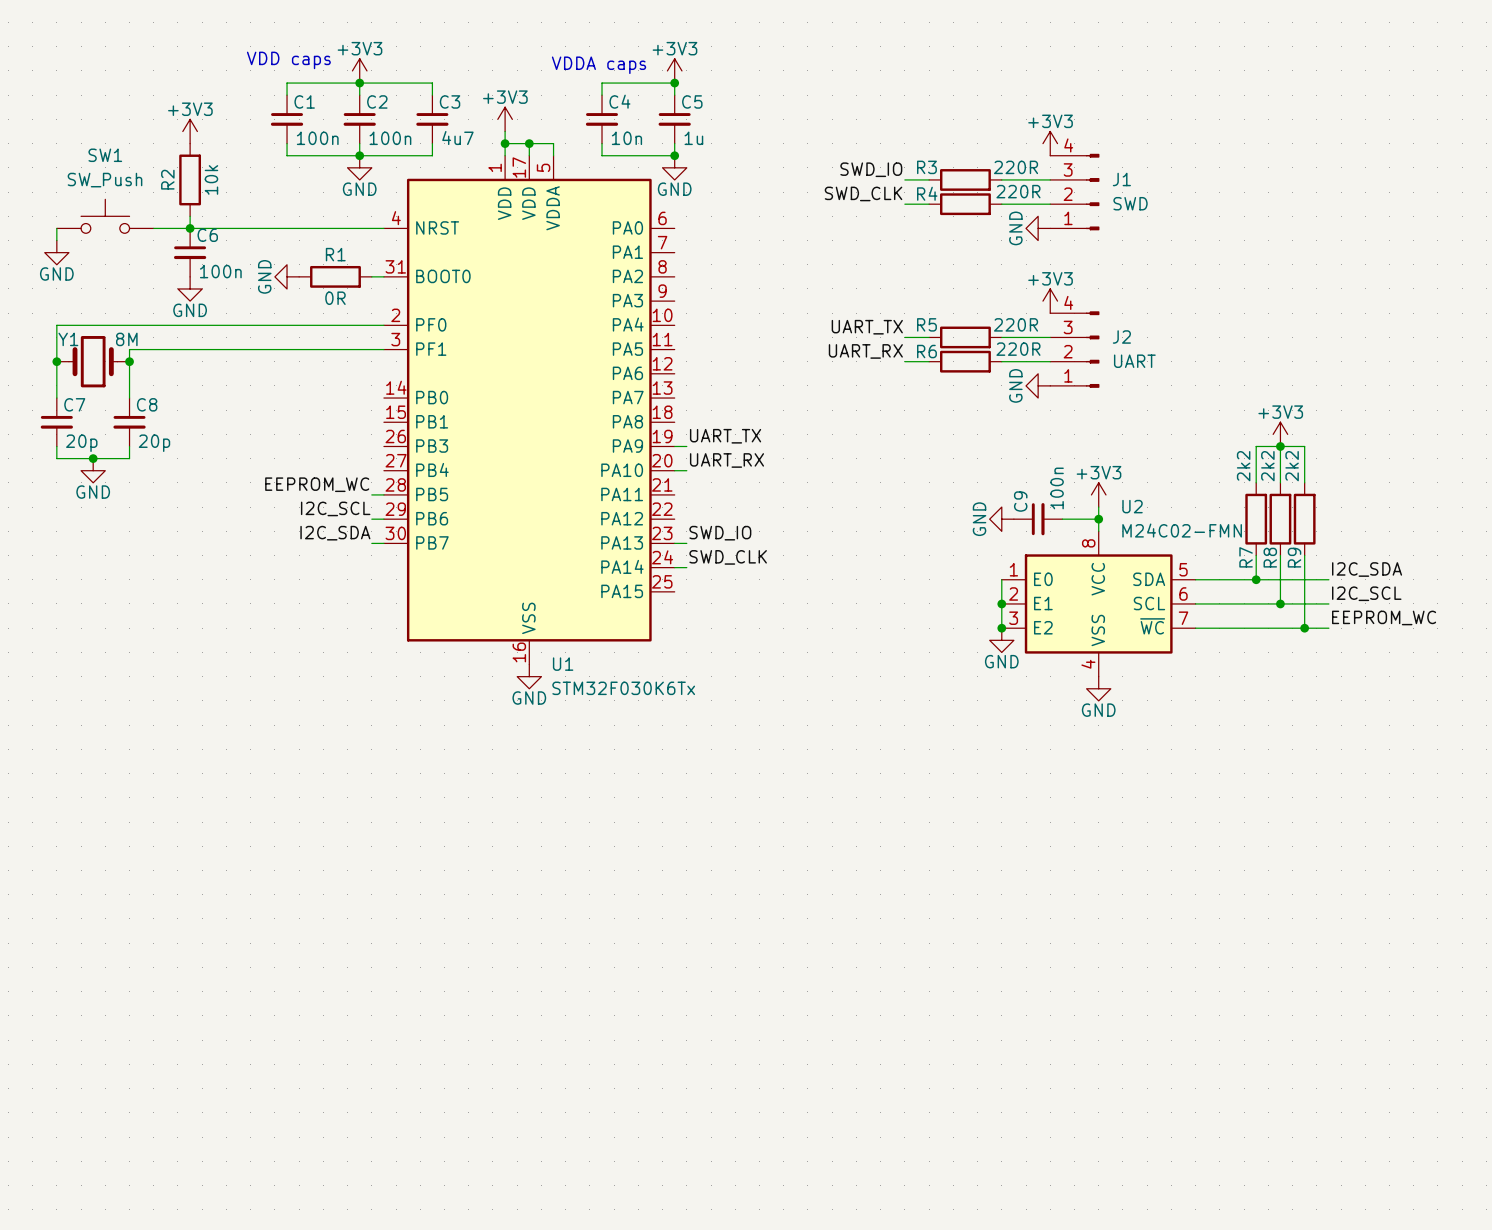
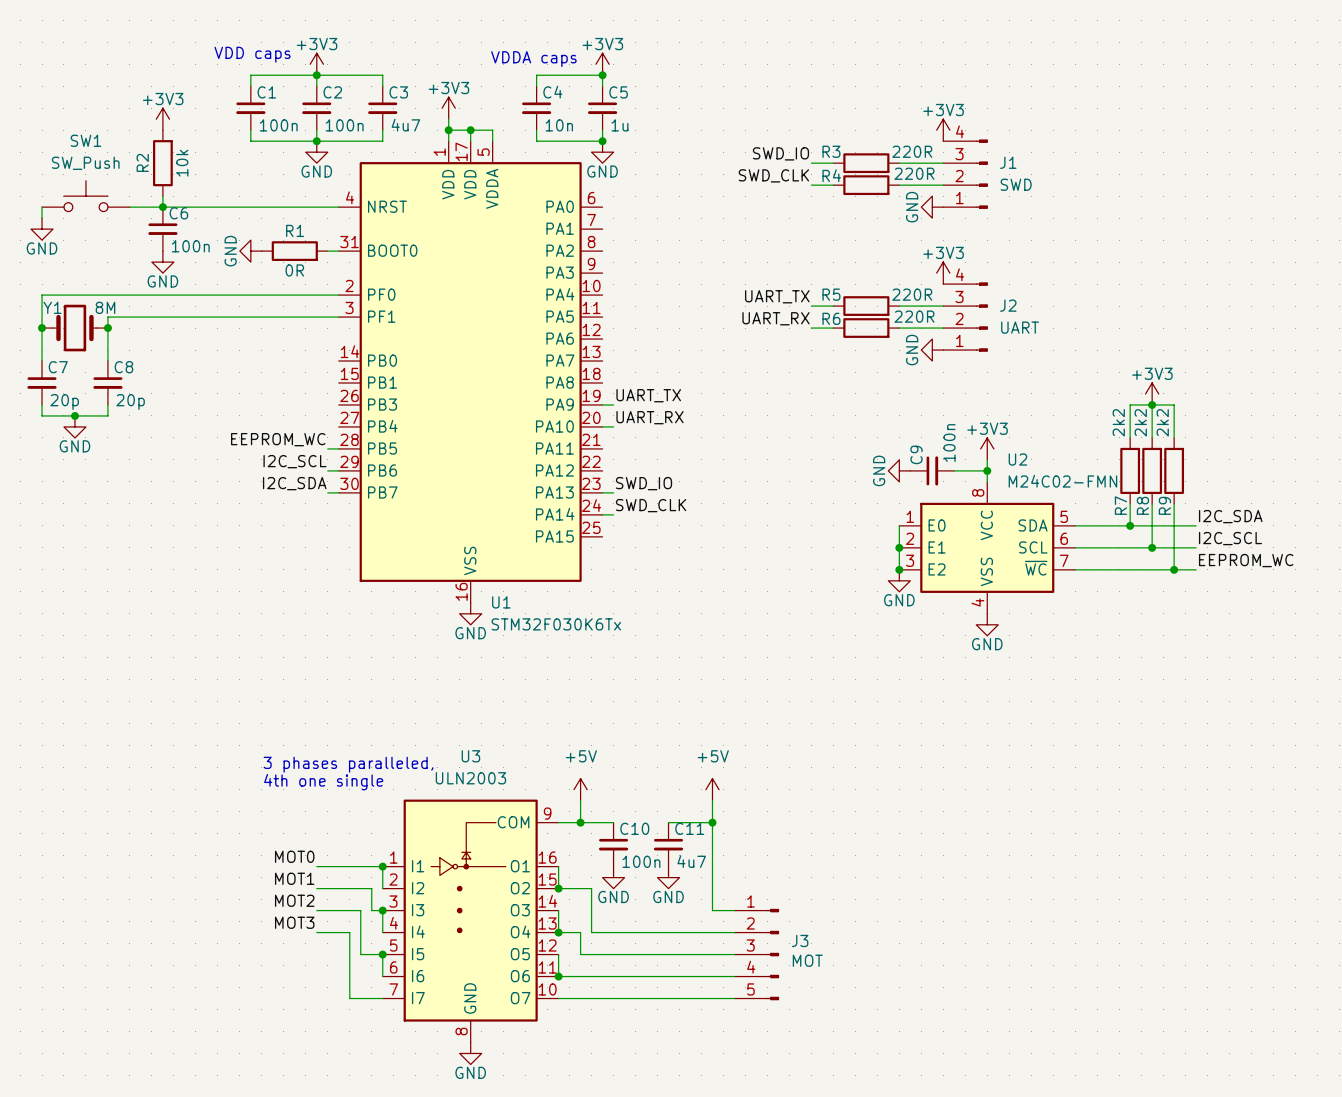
text: none -> 3 phases paralleled, (348, 764)
text: none -> 4th one single (323, 782)
power symbol: none -> +5V (580, 789)
power symbol: none -> +5V (712, 789)
wire: none -> (580, 800) (580, 822)
wire: none -> (712, 800) (712, 910) (734, 910)
wire: none -> (558, 822) (613, 822)
junction: none -> (580, 822)
wire: none -> (668, 822) (712, 822)
junction: none -> (712, 822)
C10: none -> 100n (613, 844)
C11: none -> 4u7 (668, 844)
label: none -> MOT0 (294, 856)
wire: none -> (316, 866) (382, 866) (382, 888)
junction: none -> (382, 866)
wire: none -> (558, 866) (558, 888) (591, 888) (591, 932) (734, 932)
power symbol: none -> GND (613, 877)
power symbol: none -> GND (668, 877)
label: none -> MOT1 (294, 878)
wire: none -> (316, 888) (371, 888) (371, 910) (382, 910) (382, 932)
junction: none -> (558, 888)
label: none -> MOT2 (294, 900)
wire: none -> (316, 910) (360, 910) (360, 954) (382, 954) (382, 976)
junction: none -> (382, 910)
wire: none -> (558, 910) (558, 932) (580, 932) (580, 954) (734, 954)
U3: none -> ULN2003 (470, 921)
label: none -> MOT3 (294, 922)
wire: none -> (316, 932) (349, 932) (349, 998) (382, 998)
junction: none -> (558, 932)
junction: none -> (382, 954)
wire: none -> (558, 954) (558, 976) (734, 976)
J3: none -> MOT (756, 954)
junction: none -> (558, 976)
wire: none -> (558, 998) (734, 998)
power symbol: none -> GND (470, 1053)

